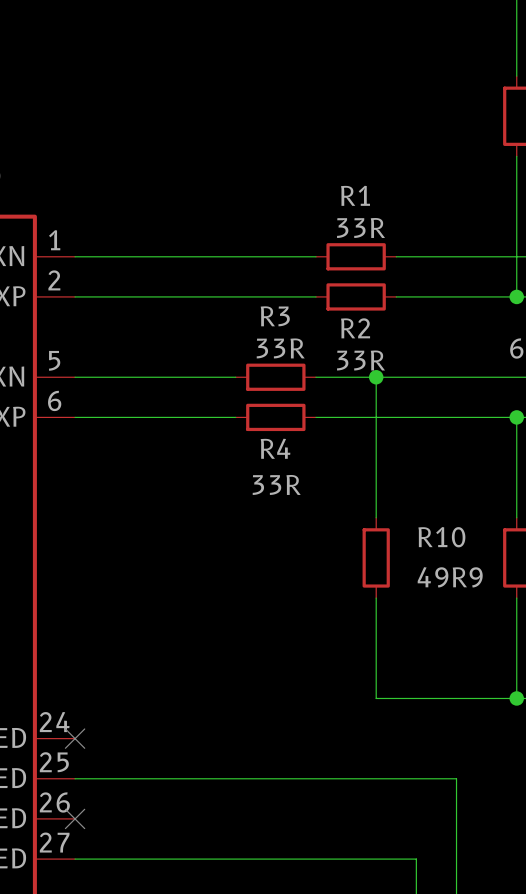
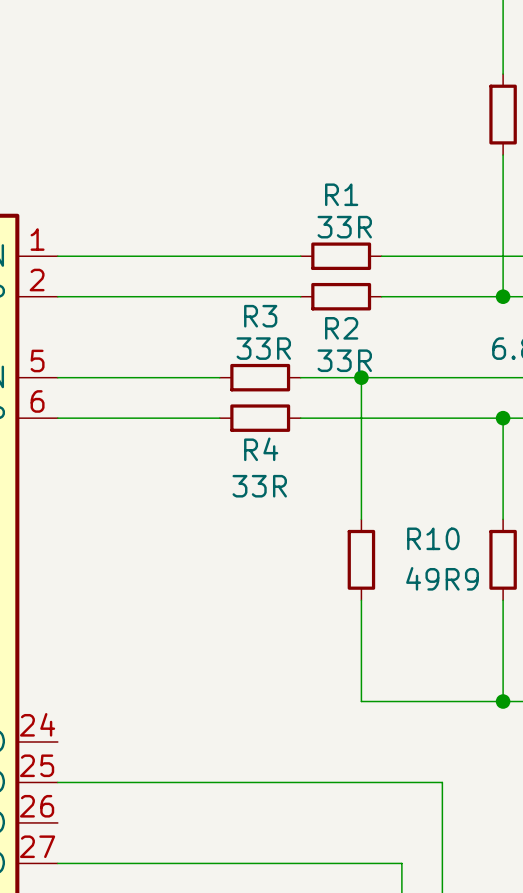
no-connect mark: (75, 738) -> none
no-connect mark: (75, 818) -> none

